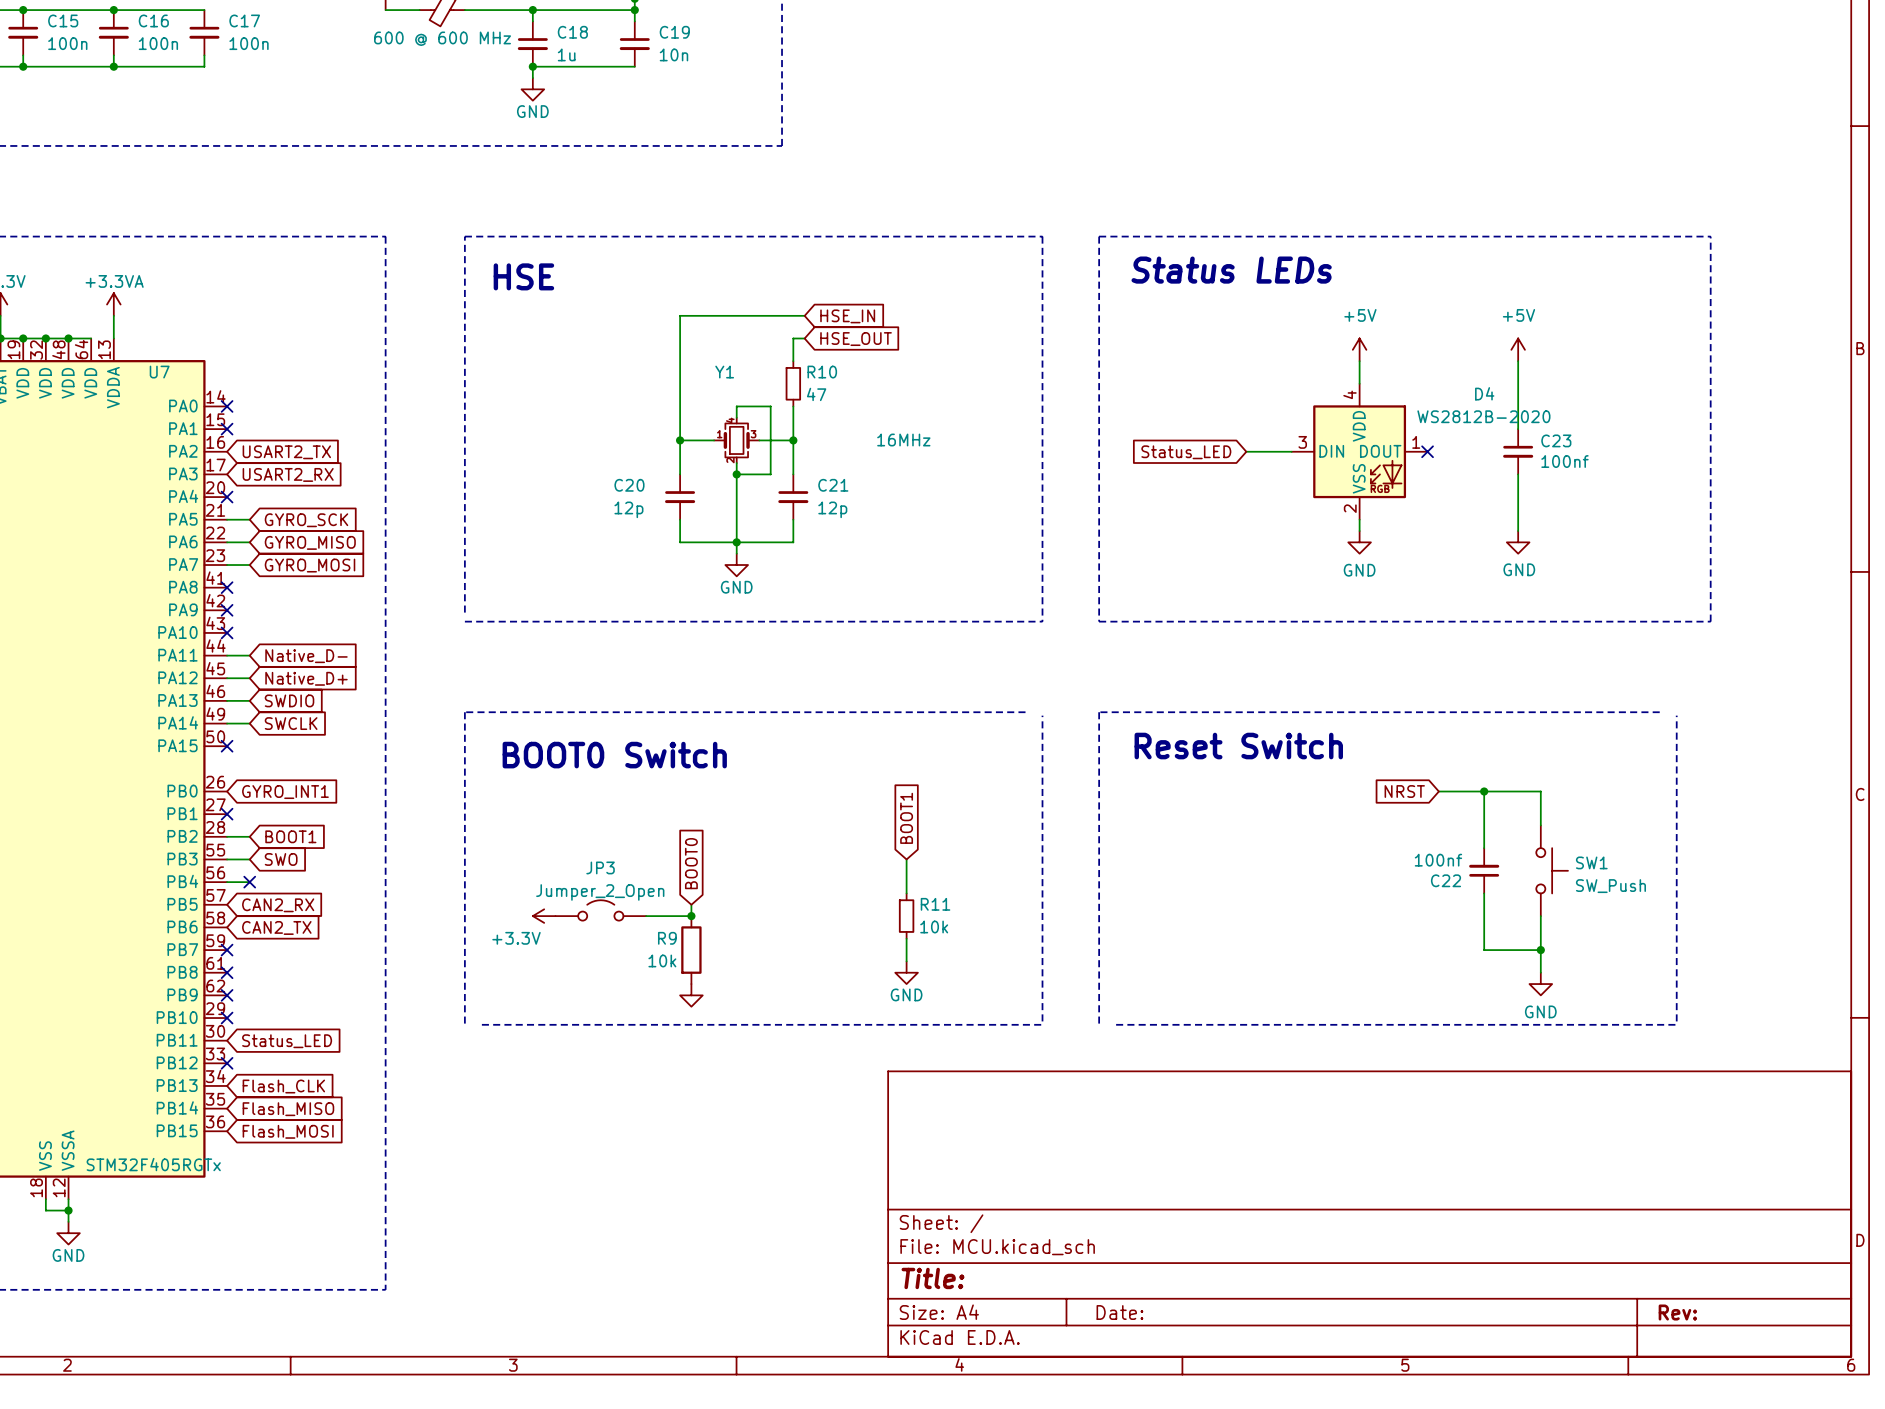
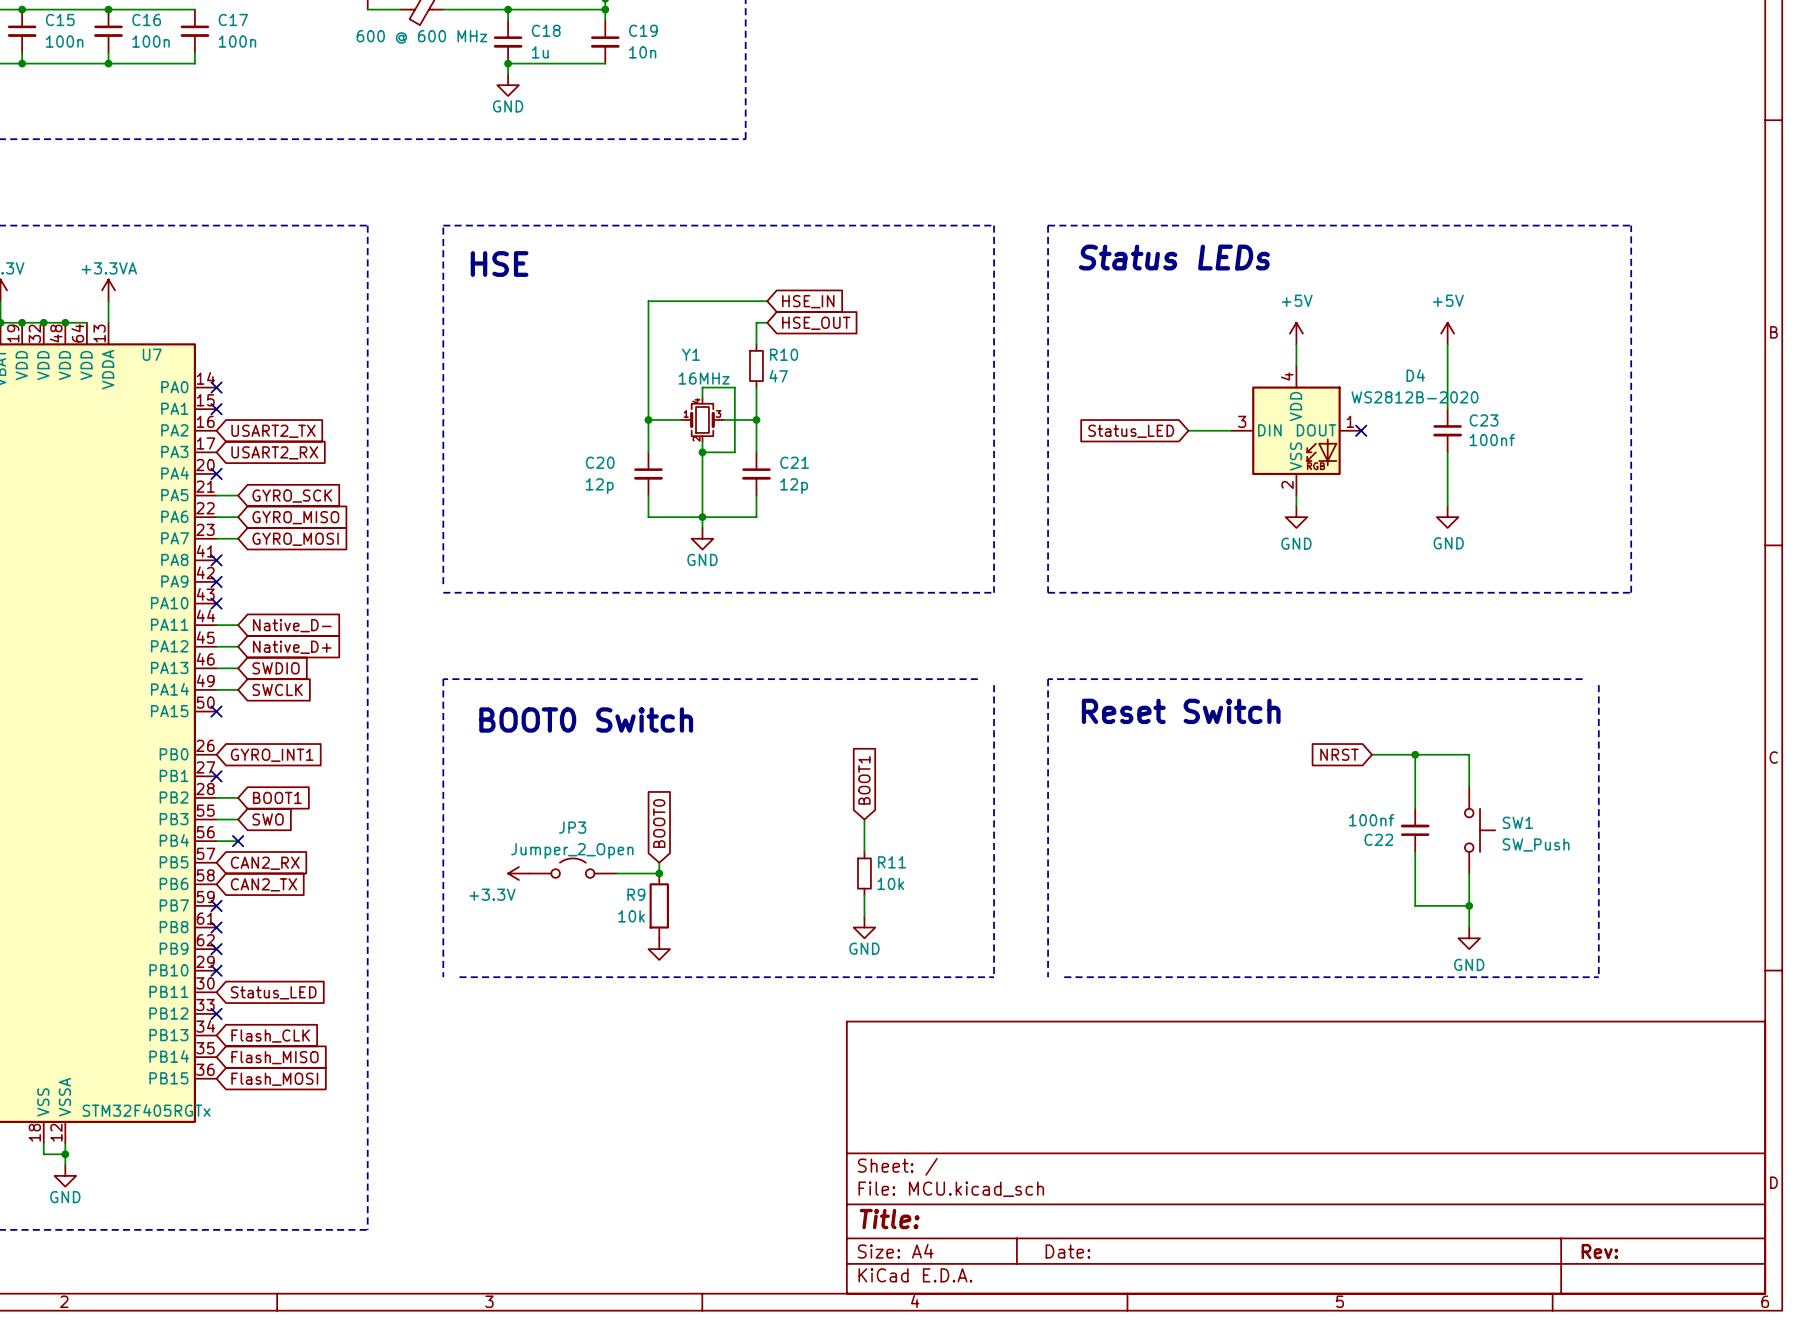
Y1 value position: 16MHz (903, 440) -> 16MHz (704, 378)

